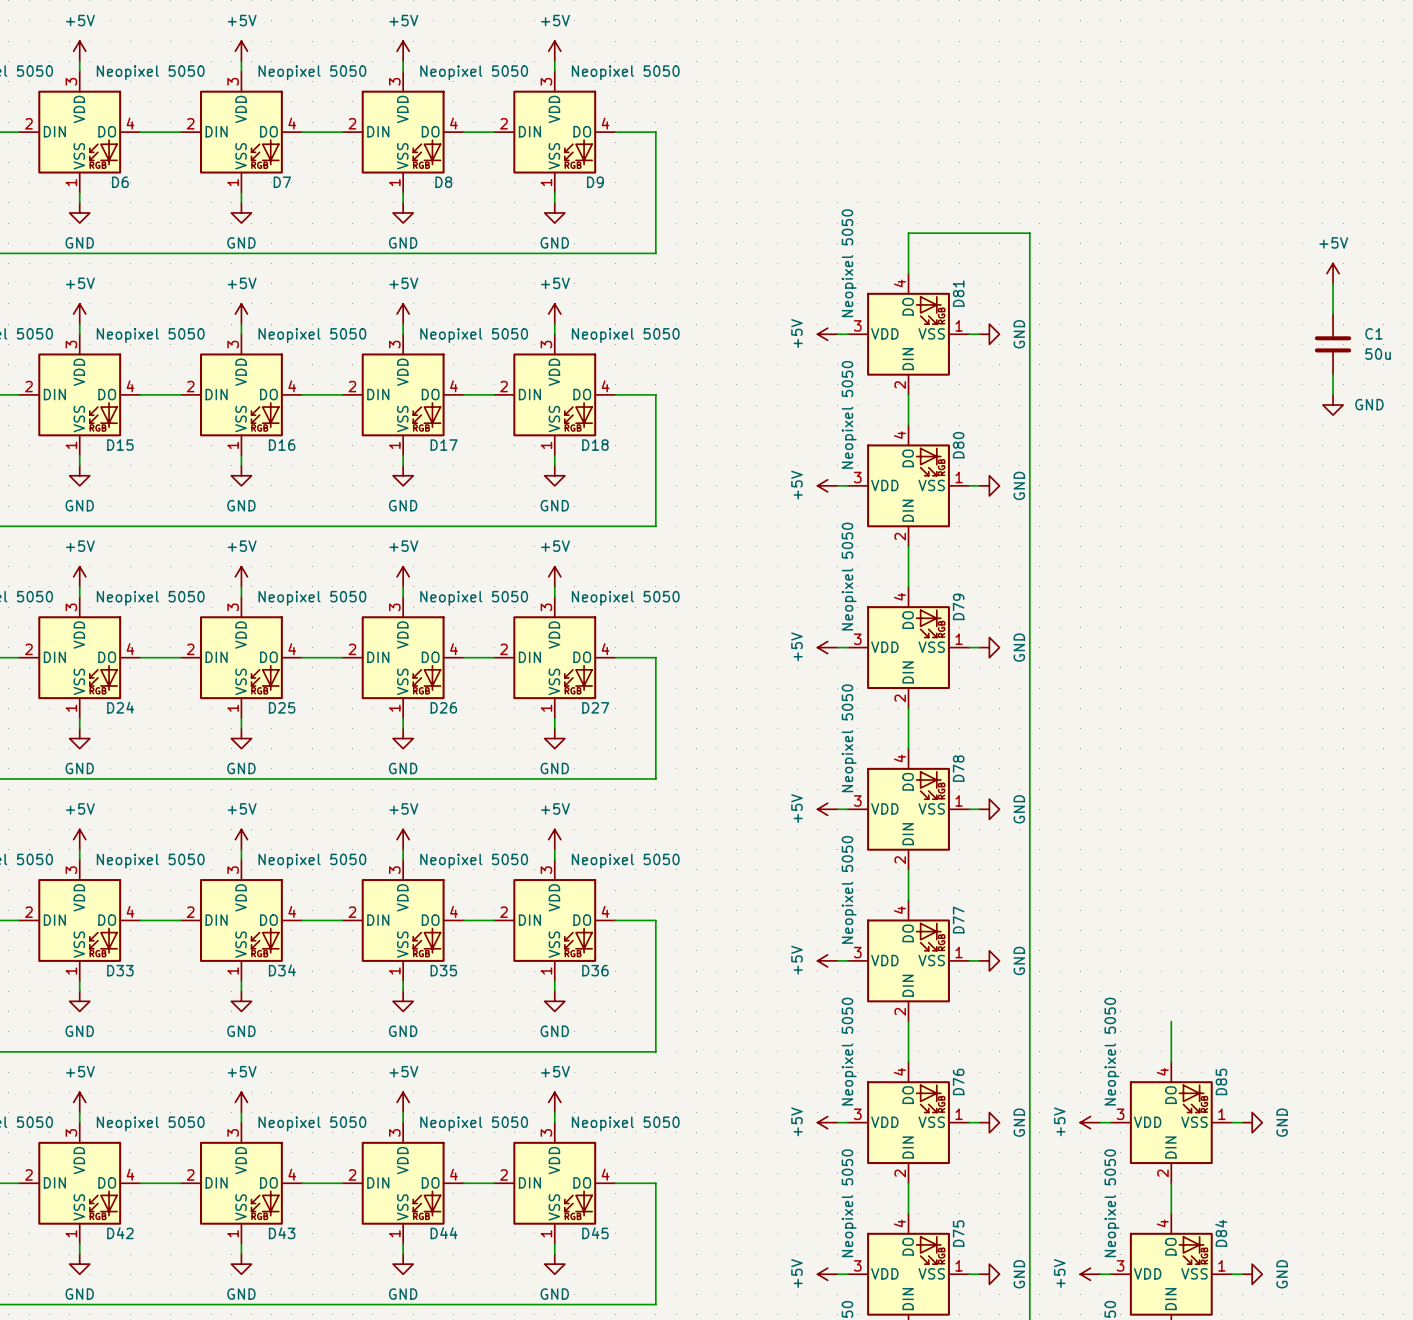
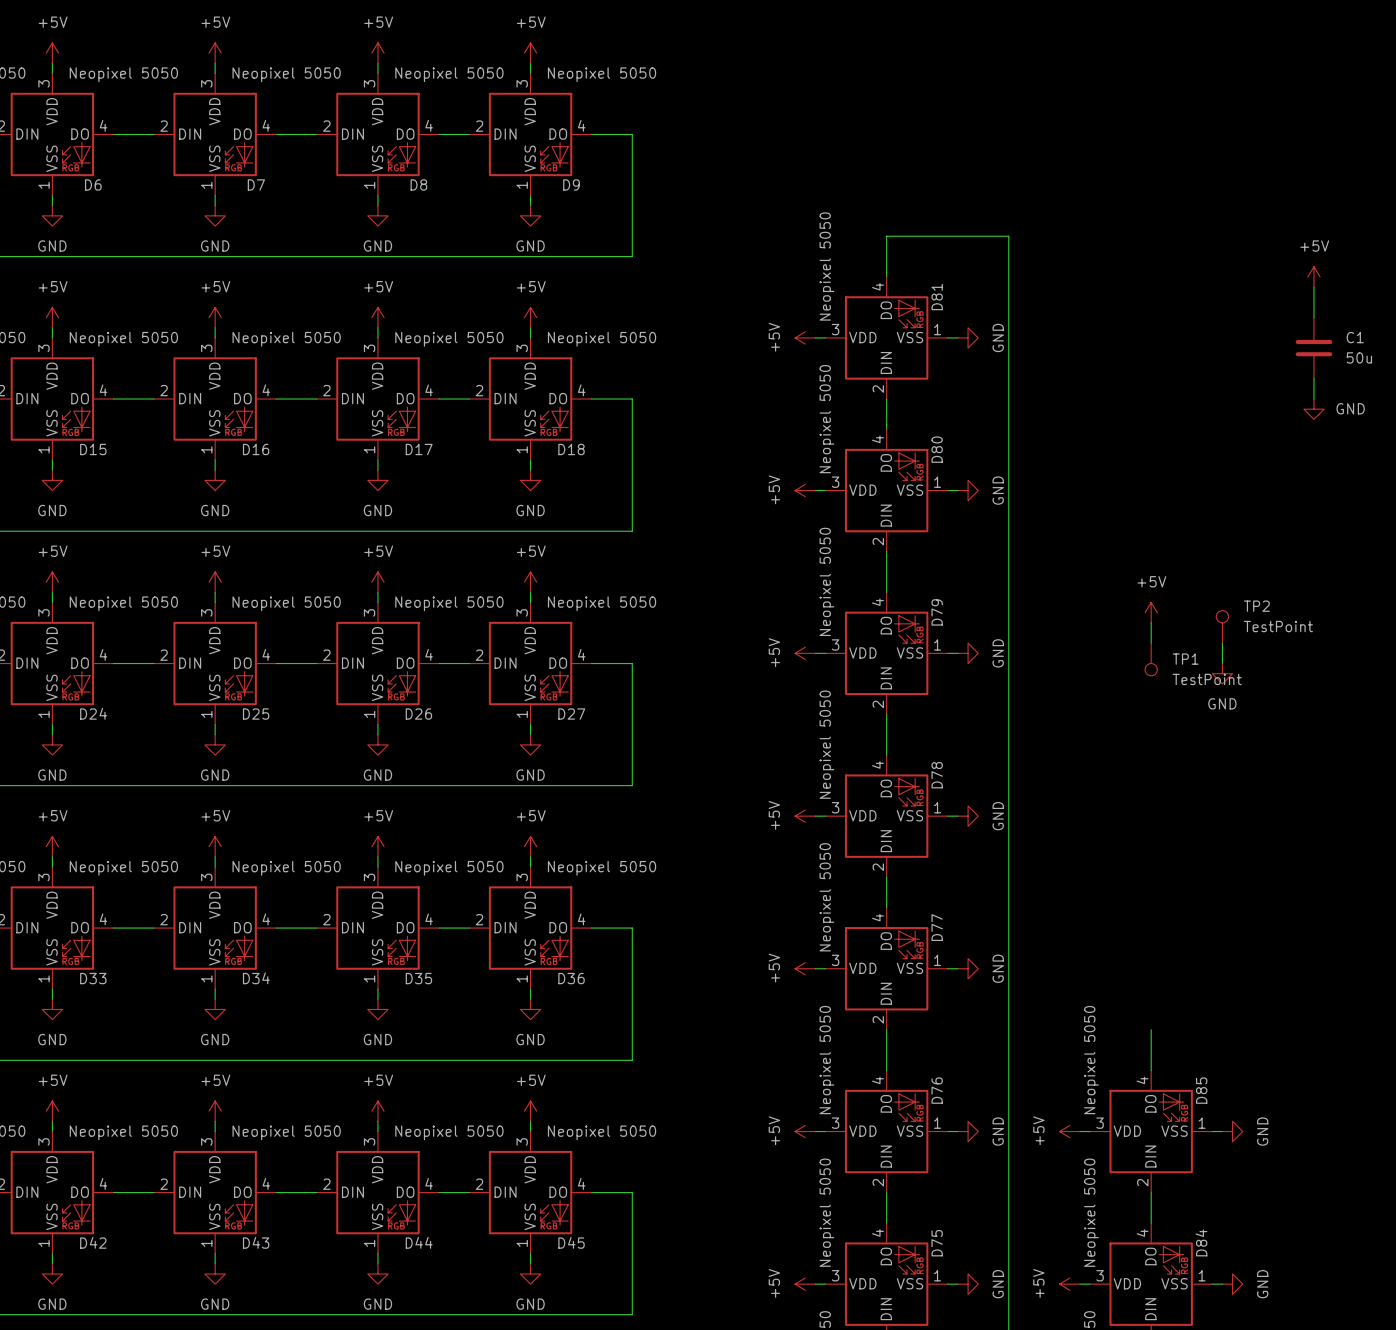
power symbol: none -> +5V (1151, 612)
wire: none -> (1151, 622) (1151, 643)
TP2: none -> TestPoint (1222, 626)
wire: none -> (1222, 643) (1222, 663)
TP1: none -> TestPoint (1151, 659)
power symbol: none -> GND (1222, 673)

